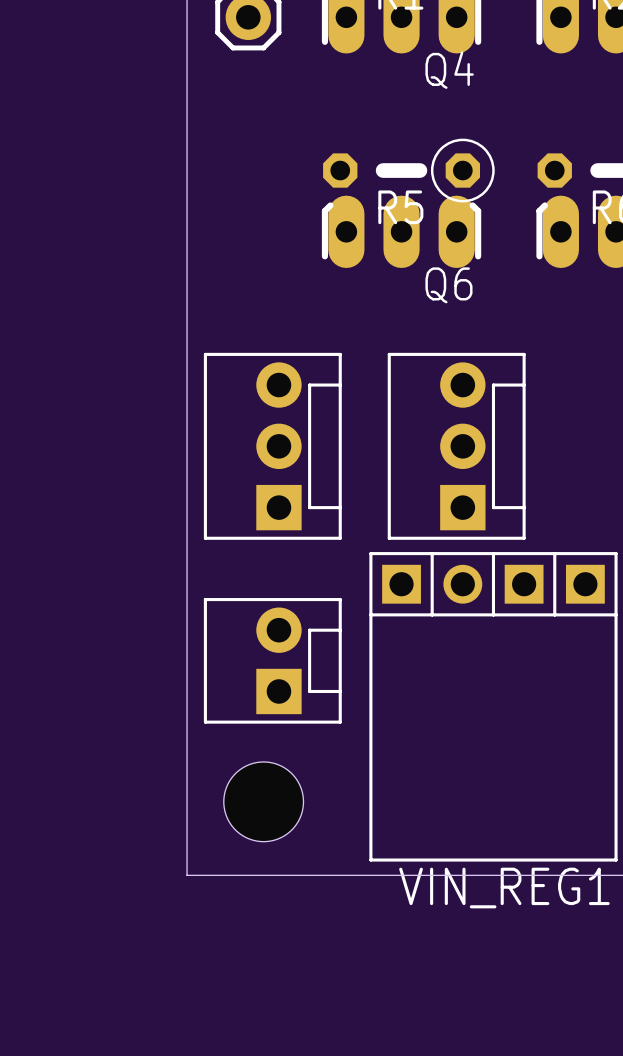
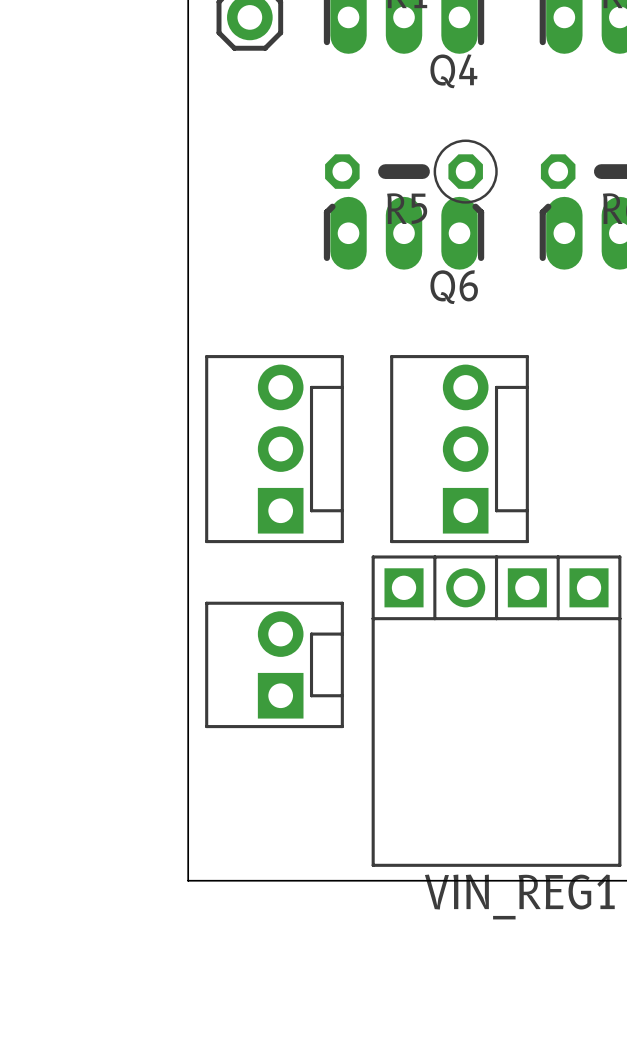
part: (263, 801) -> none

